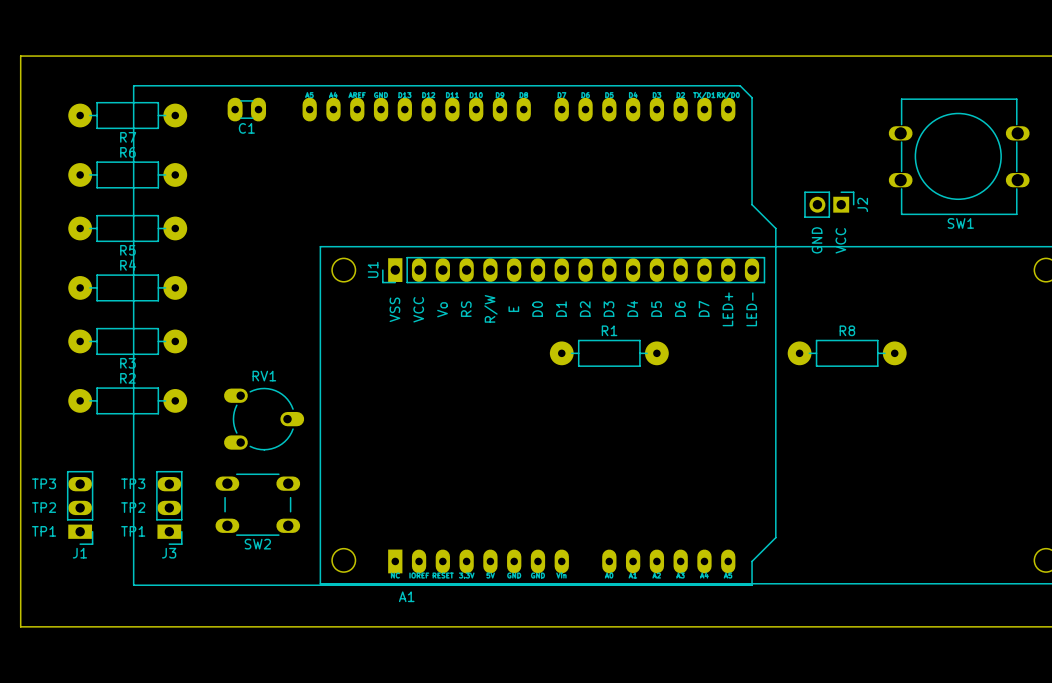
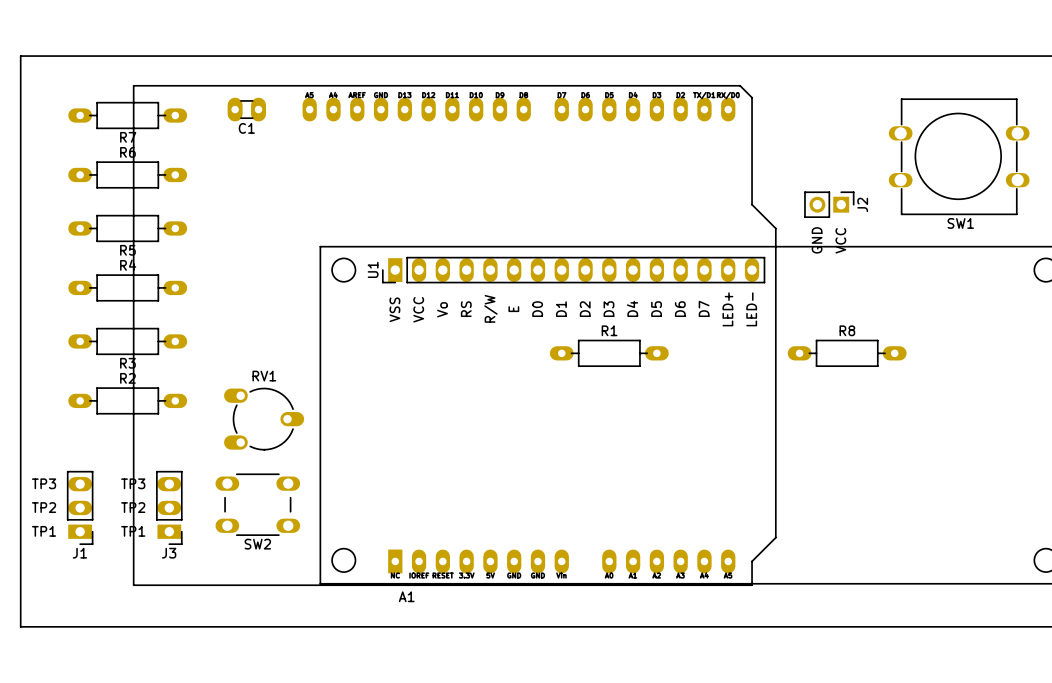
R7 footprint: [68, 102, 188, 129] -> [68, 102, 188, 129]
R6 footprint: [68, 161, 188, 189] -> [68, 161, 188, 189]
R5 footprint: [68, 215, 188, 242] -> [68, 215, 188, 242]
R4 footprint: [68, 274, 188, 302] -> [68, 274, 188, 302]
R3 footprint: [68, 328, 188, 355] -> [68, 328, 188, 355]
R1 footprint: [549, 339, 669, 367] -> [549, 339, 669, 367]
R8 footprint: [787, 339, 907, 367] -> [787, 339, 907, 367]
R2 footprint: [68, 387, 188, 415] -> [68, 387, 188, 415]

